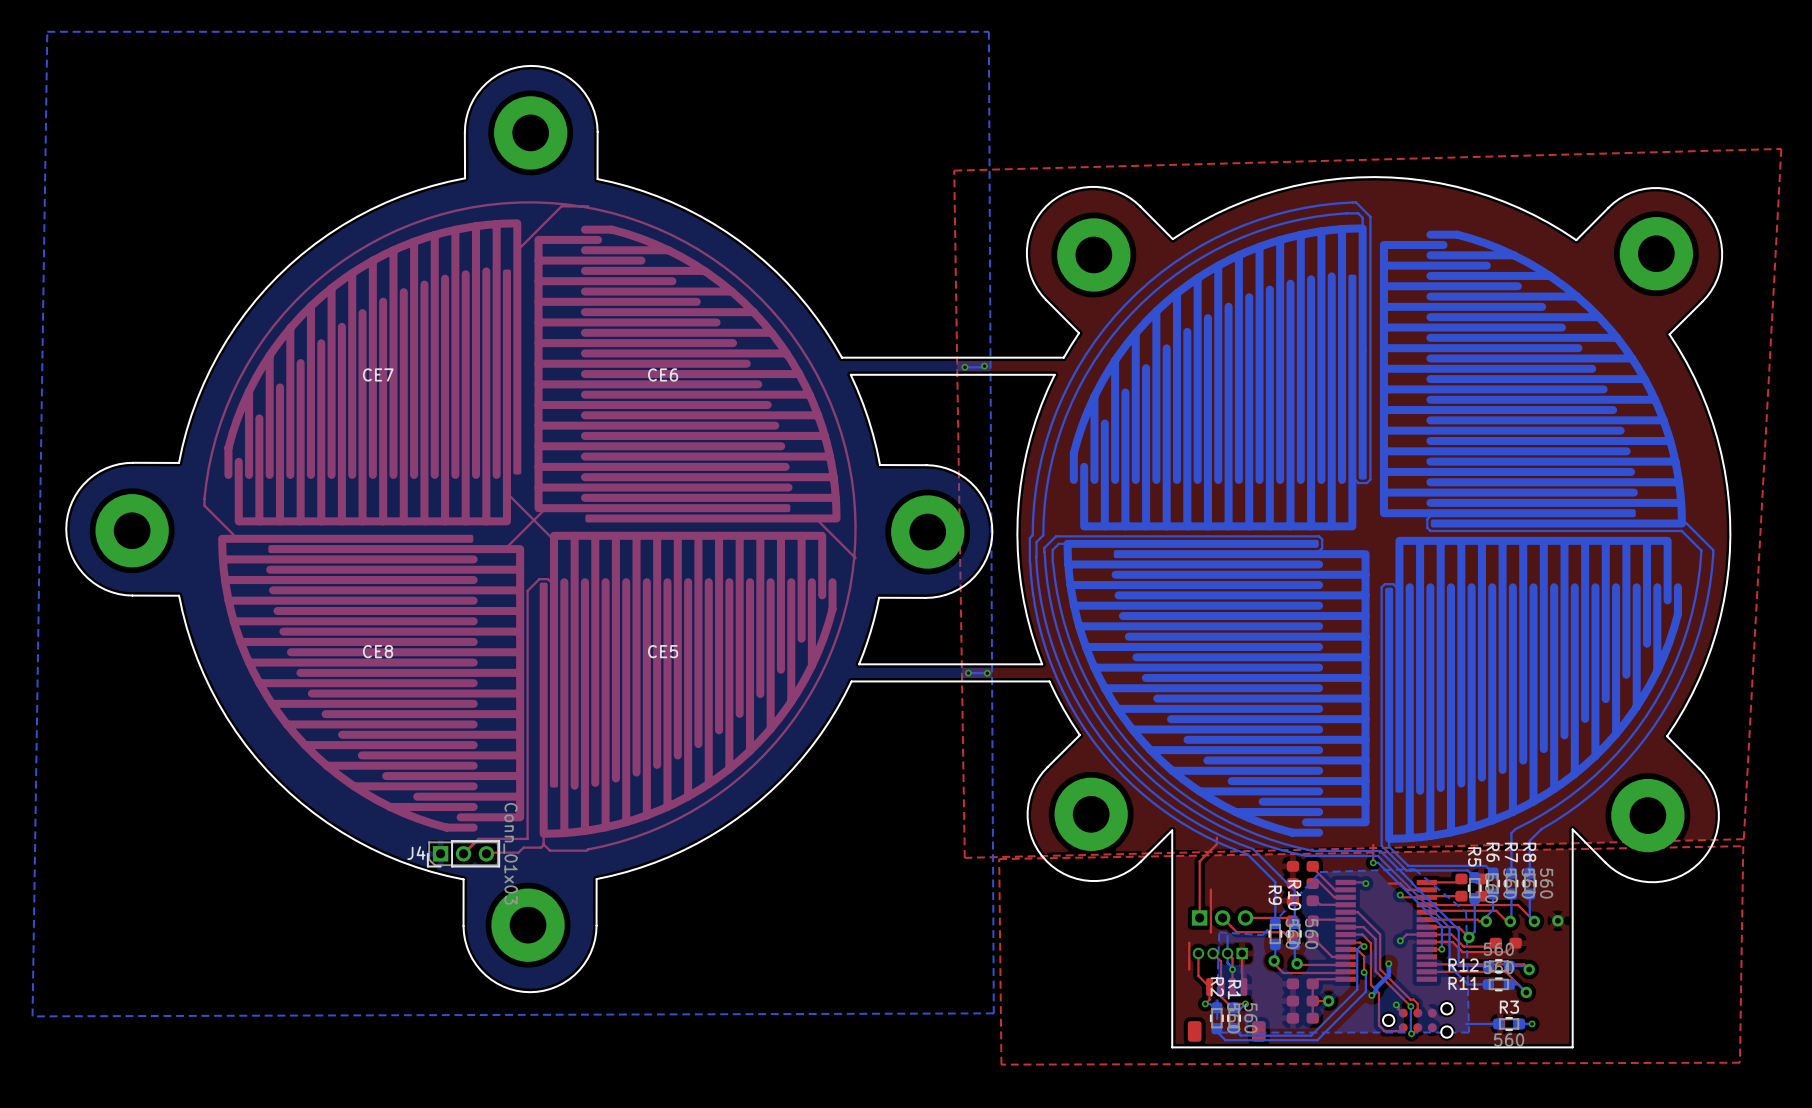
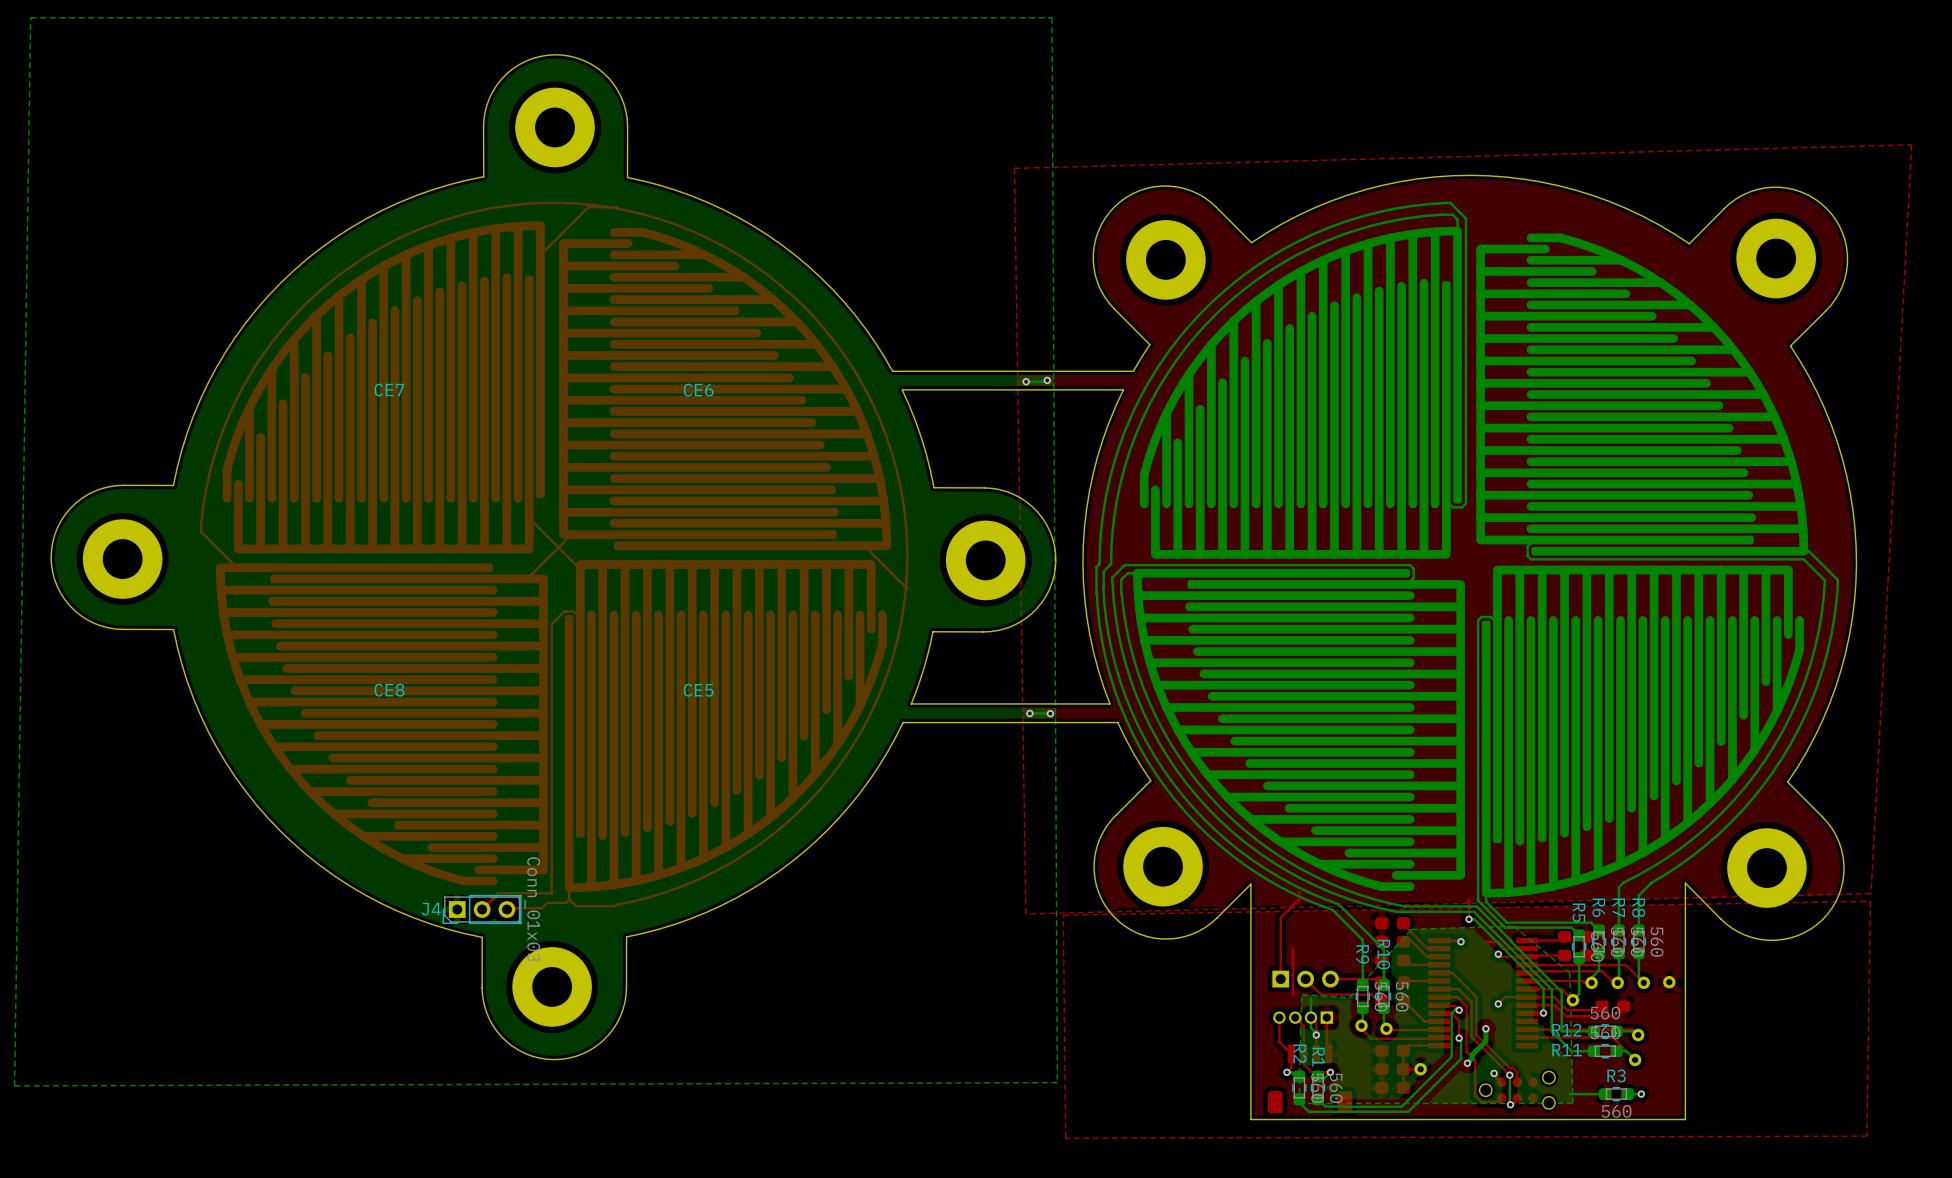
top track: (1189, 942) (1189, 969) -> none

